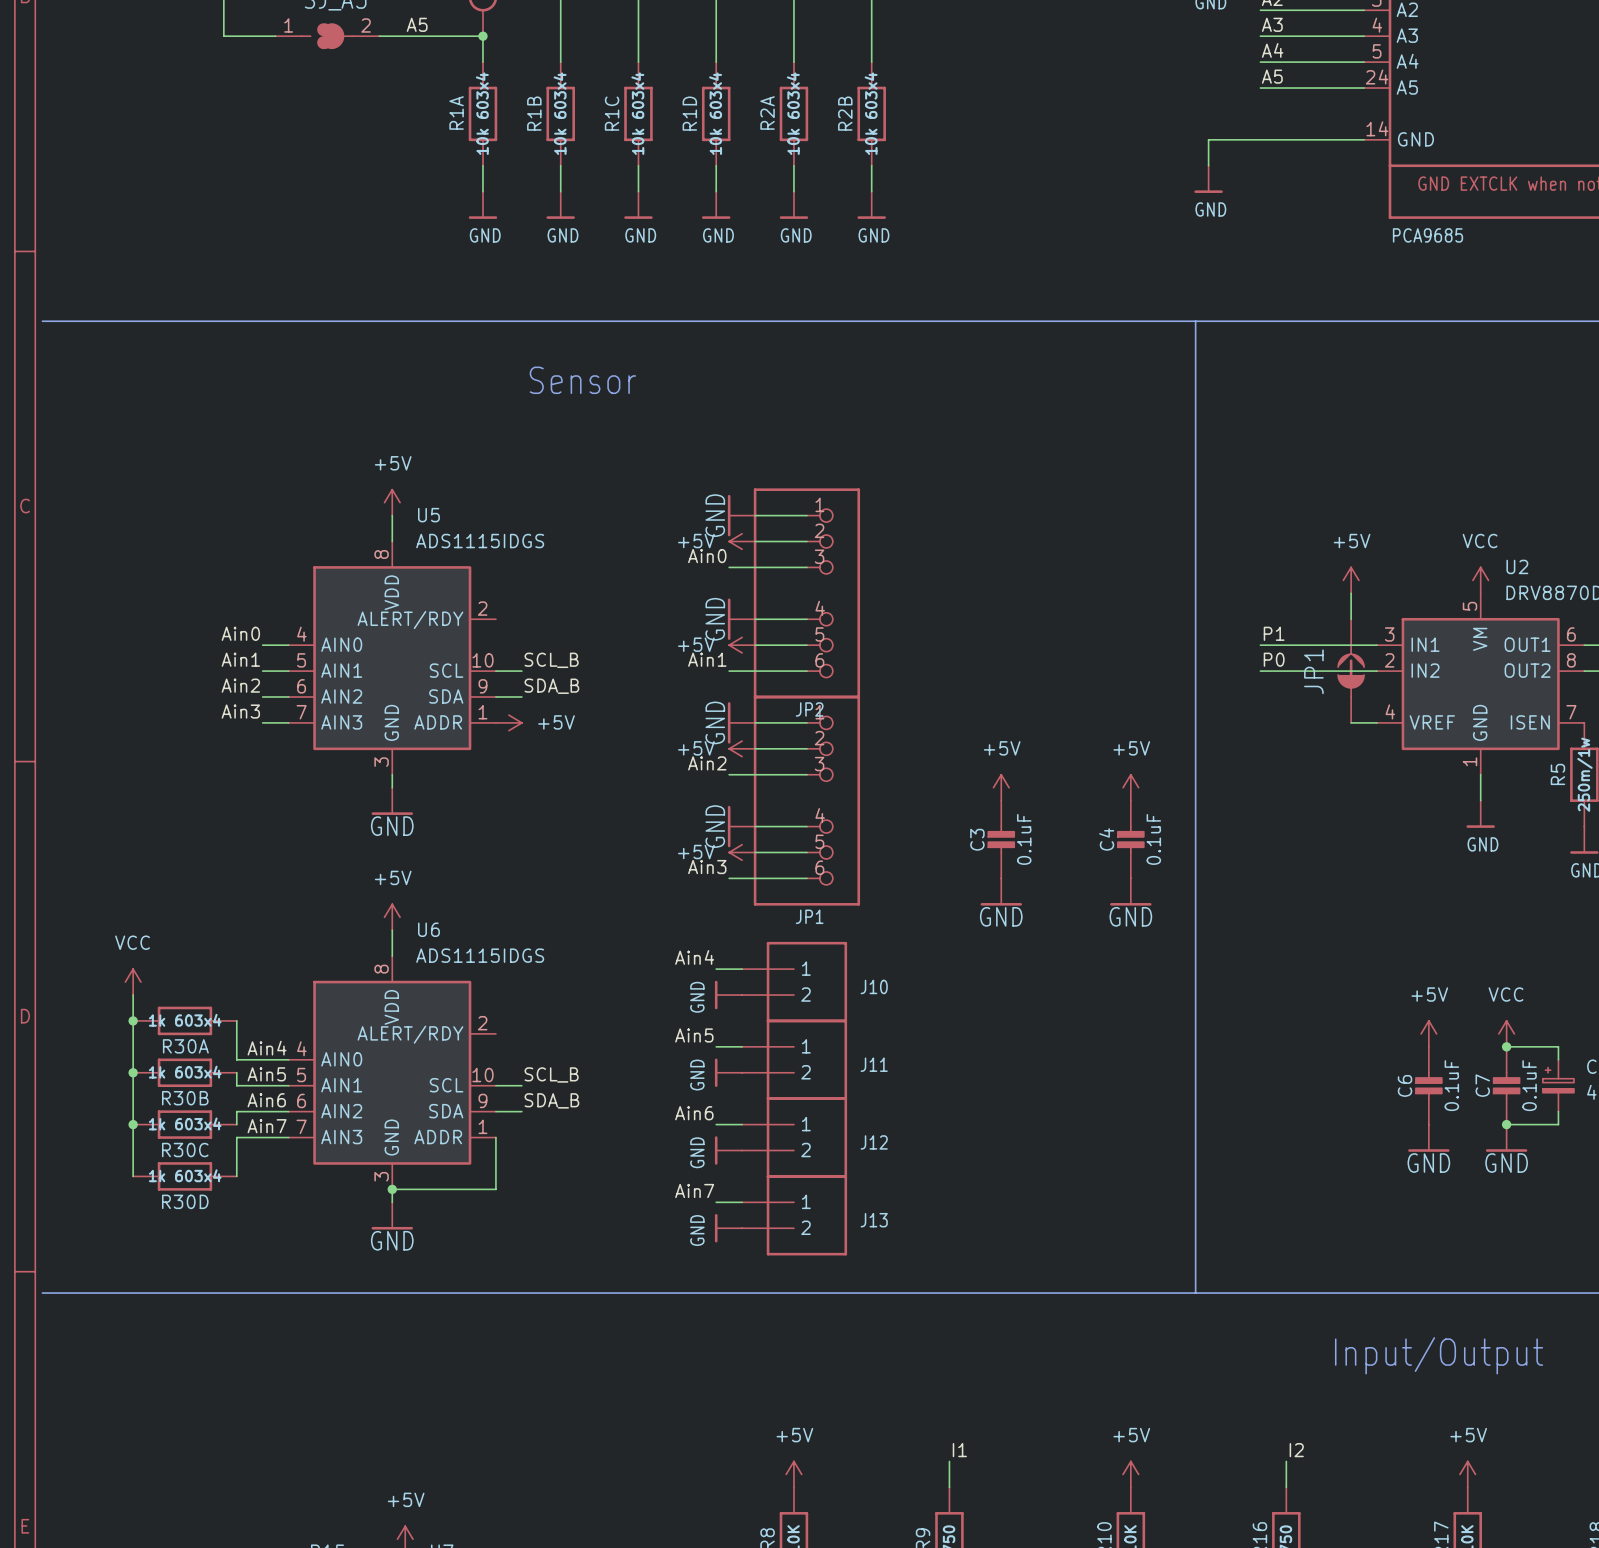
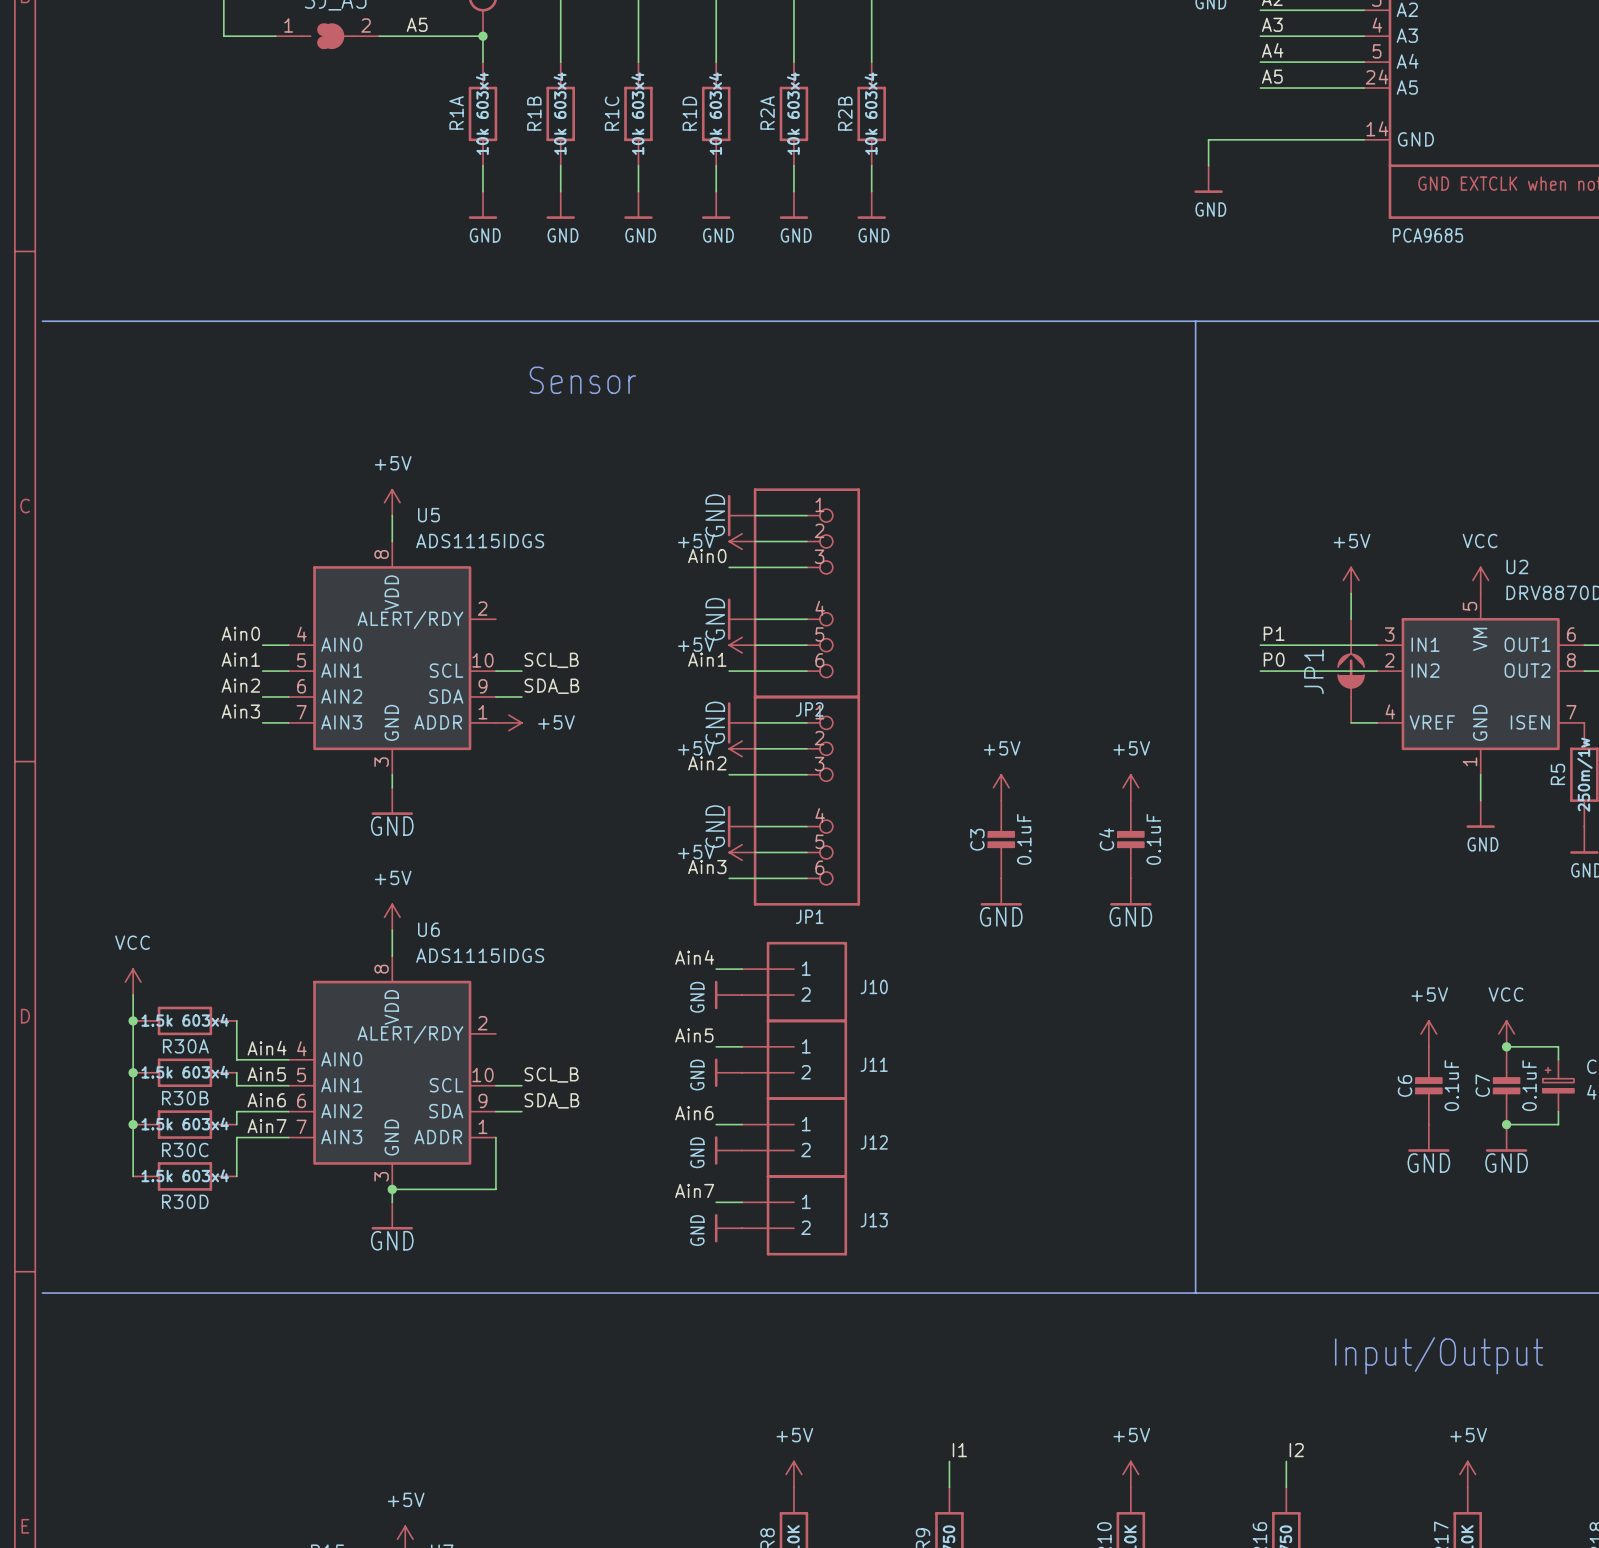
R30A value: 1k 603x4 (185, 1020) -> 1.5k 603x4 (185, 1020)
R30B value: 1k 603x4 (185, 1072) -> 1.5k 603x4 (185, 1072)
R30C value: 1k 603x4 (185, 1123) -> 1.5k 603x4 (185, 1123)
R30D value: 1k 603x4 (185, 1175) -> 1.5k 603x4 (185, 1175)

